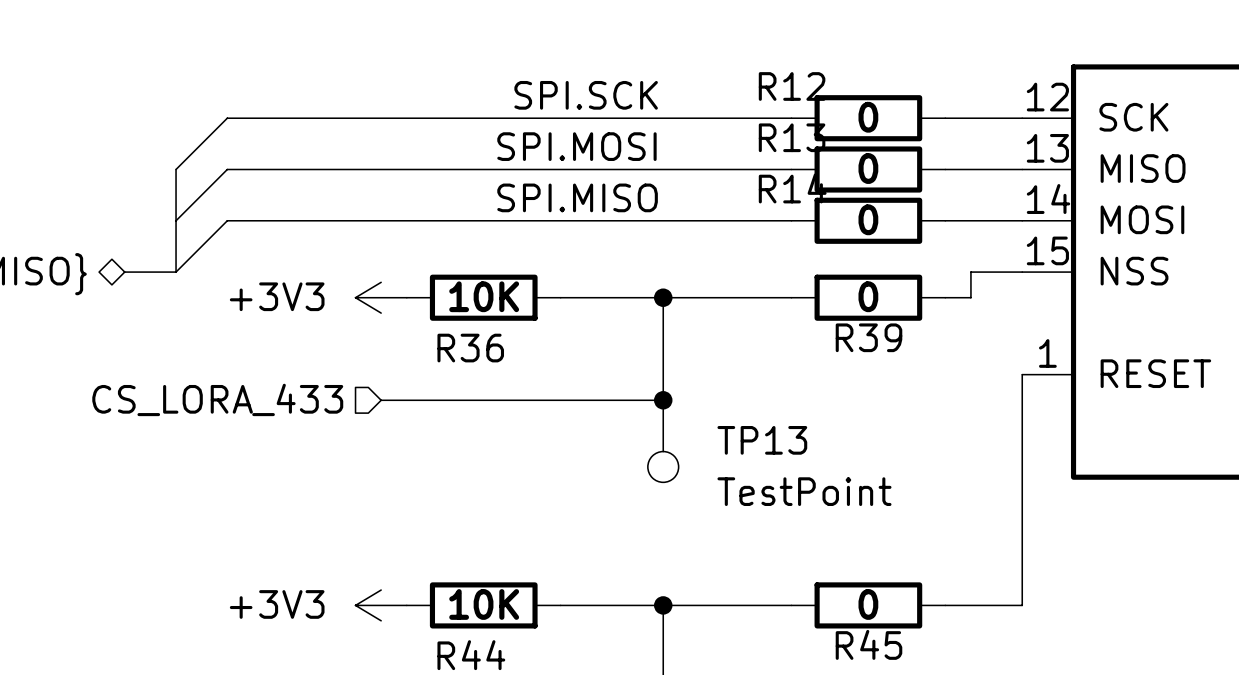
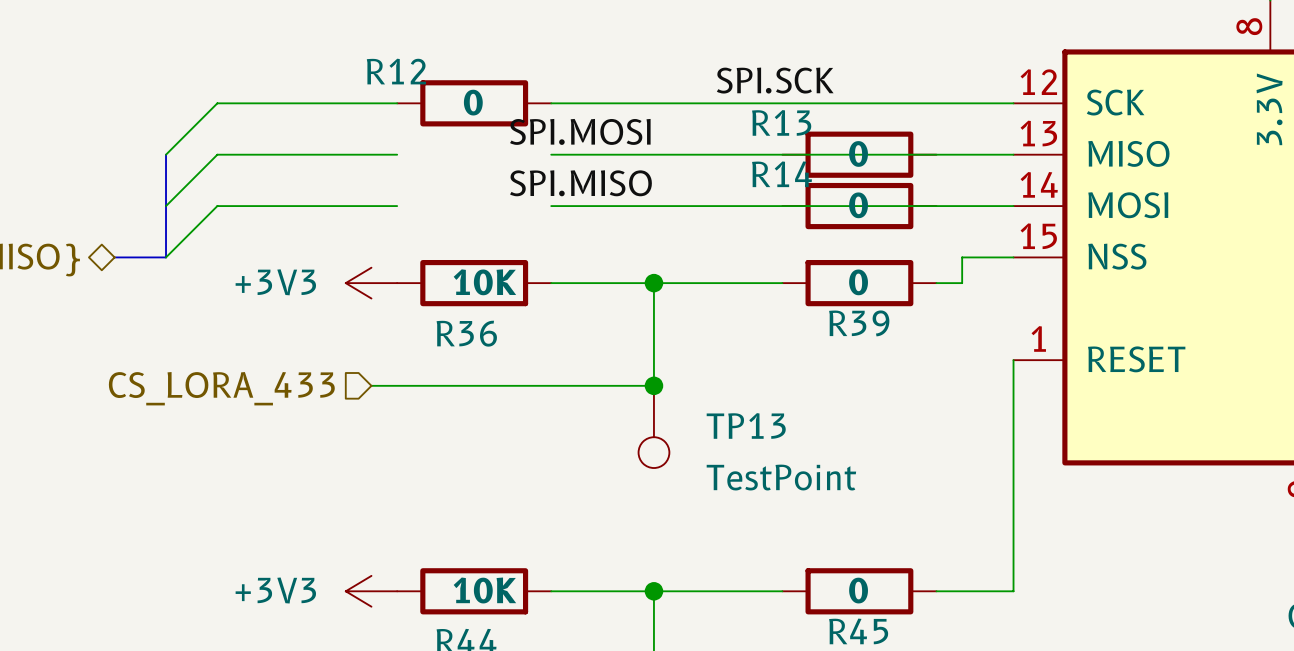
label position: SPI.SCK (586, 95) -> SPI.SCK (775, 80)
wire: (406, 118) (560, 118) -> (782, 103) (936, 103)
R12 position: (868, 118) -> (474, 103)
wire: (406, 169) (560, 169) -> (782, 154) (936, 154)
wire: (406, 220) (560, 220) -> (782, 206) (936, 206)

